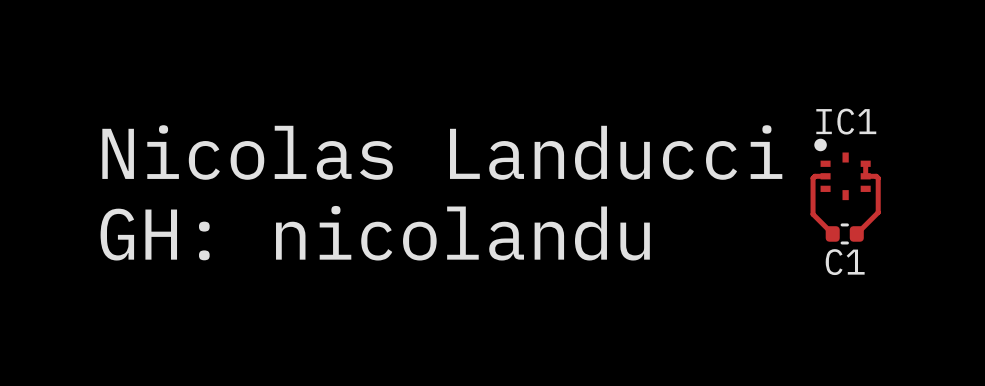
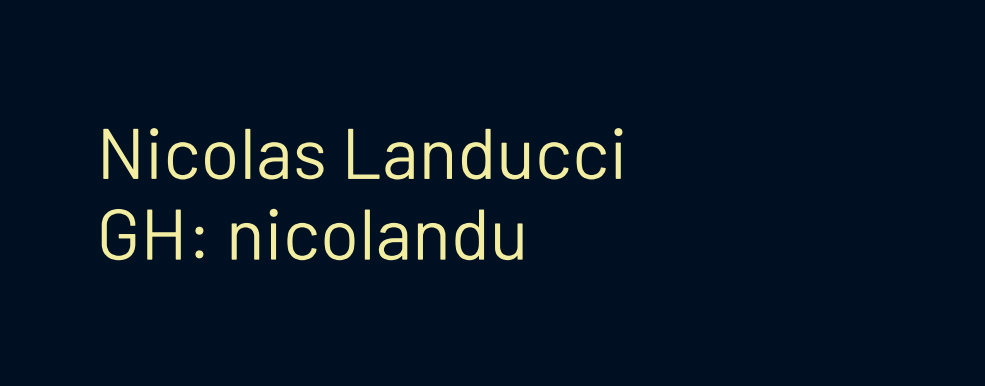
track: (865, 163) (865, 176) (876, 176) (878, 178) (878, 212) (856, 233) -> none
IC1: (842, 169) -> none
track: (825, 176) (814, 176) (813, 178) (813, 214) (832, 233) -> none
C1: (844, 233) -> none

